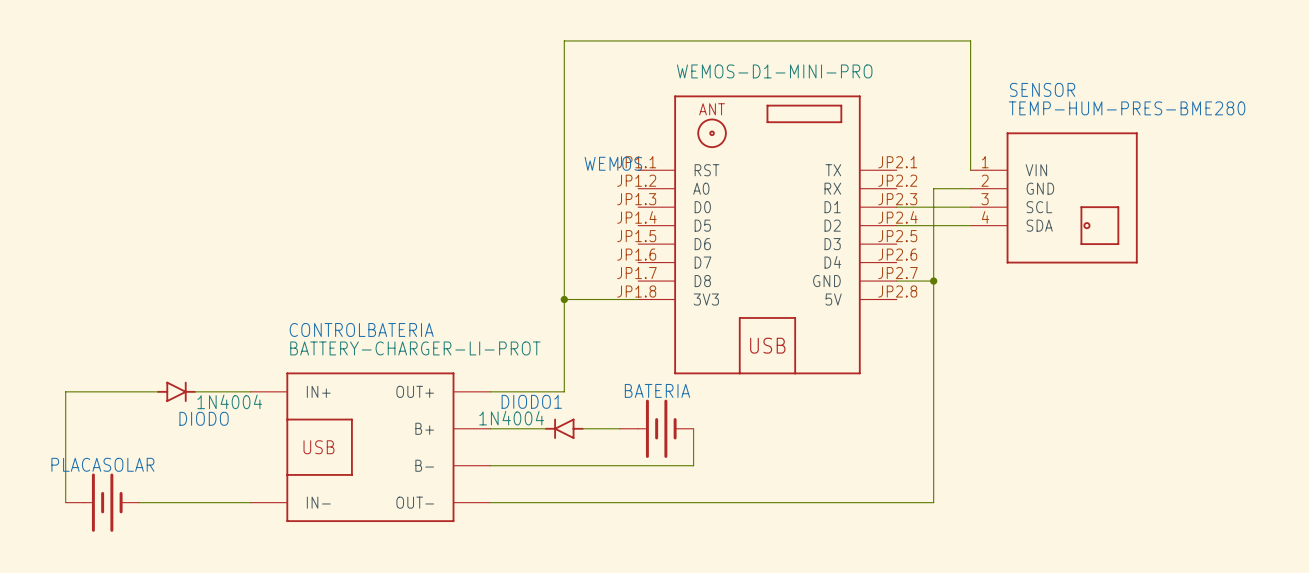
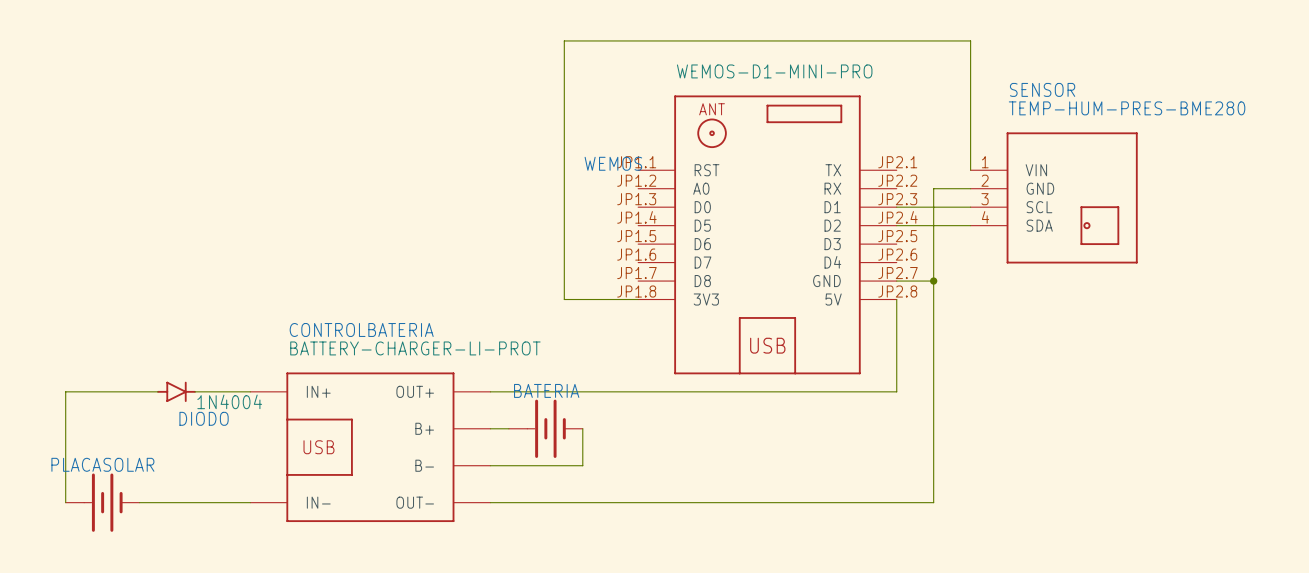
wire: (564, 299) (564, 391) -> (896, 299) (896, 391) (564, 391)
junction: (564, 299) -> none
DIODO1: 1N4004 (564, 428) -> none
wire: (582, 428) (619, 428) -> (582, 428) (582, 465)
BATERIA position: (656, 428) -> (545, 428)
wire: (693, 428) (693, 465) (582, 465) -> none

